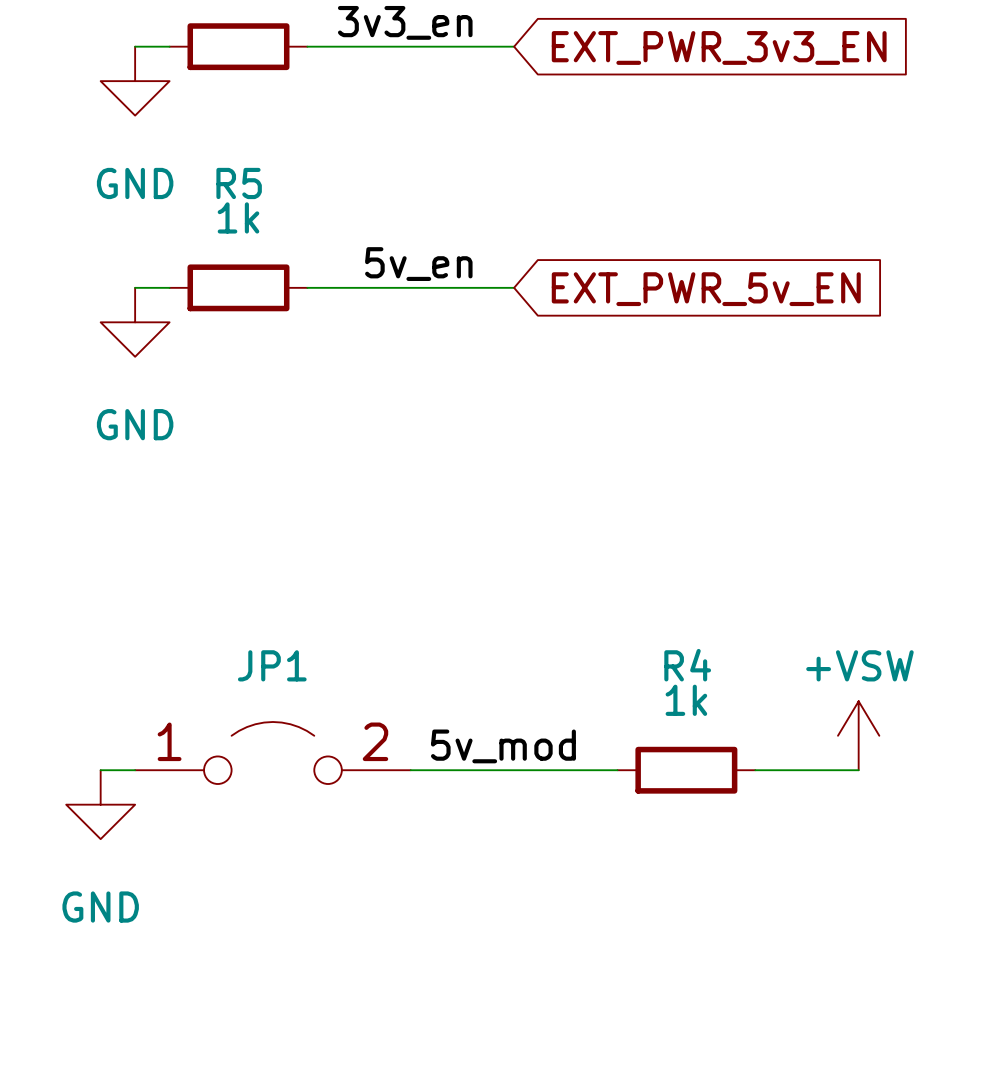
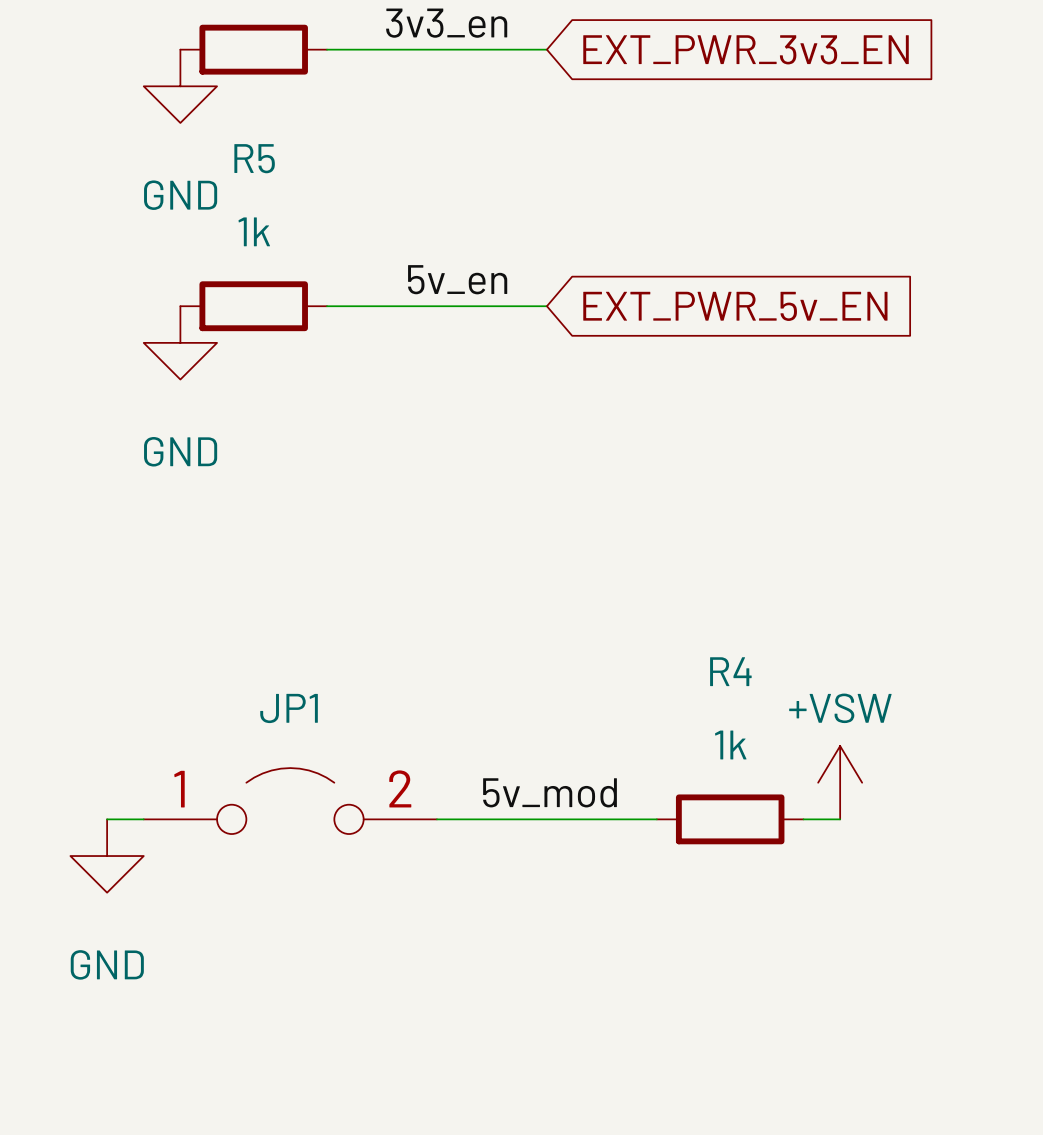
wire: (135, 46) (169, 46) -> none
power symbol position: GND (135, 81) -> GND (180, 86)
R5 name position: R5 (239, 183) -> R5 (254, 158)
wire: (135, 287) (169, 287) -> none
power symbol position: GND (135, 322) -> GND (180, 342)
R4 name position: R4 (687, 665) -> R4 (730, 671)
power symbol position: +VSW (858, 735) -> +VSW (840, 782)
wire: (789, 770) (858, 770) -> none

